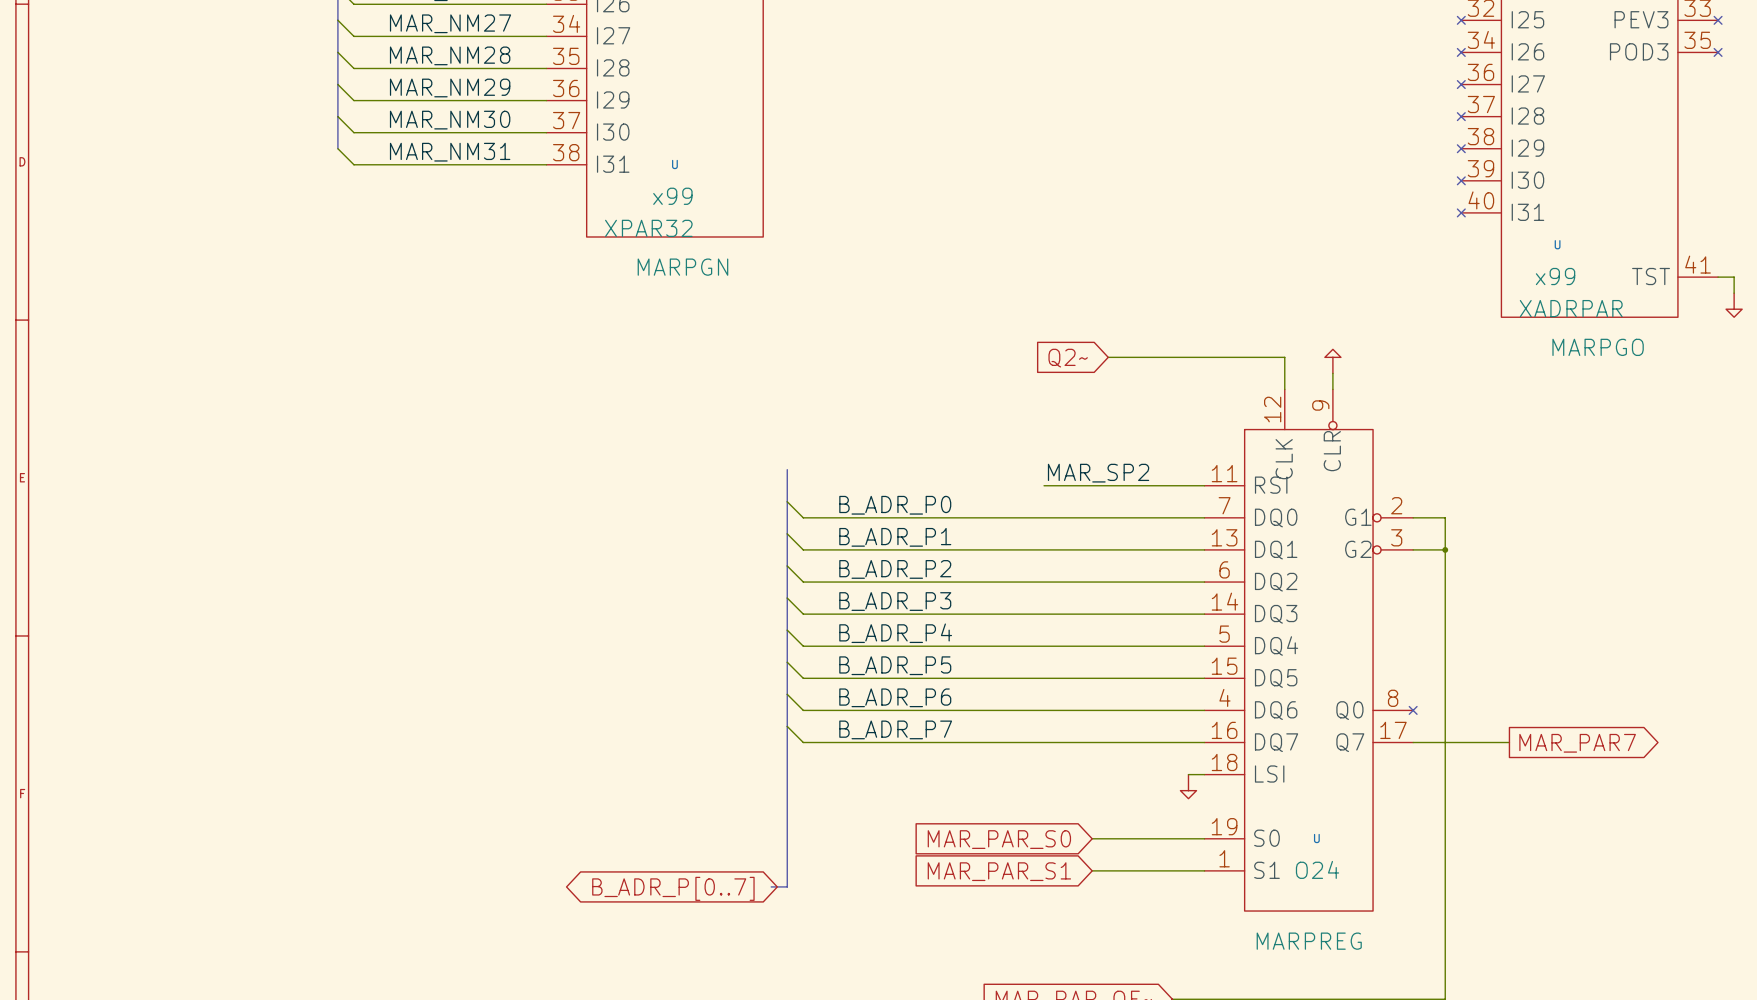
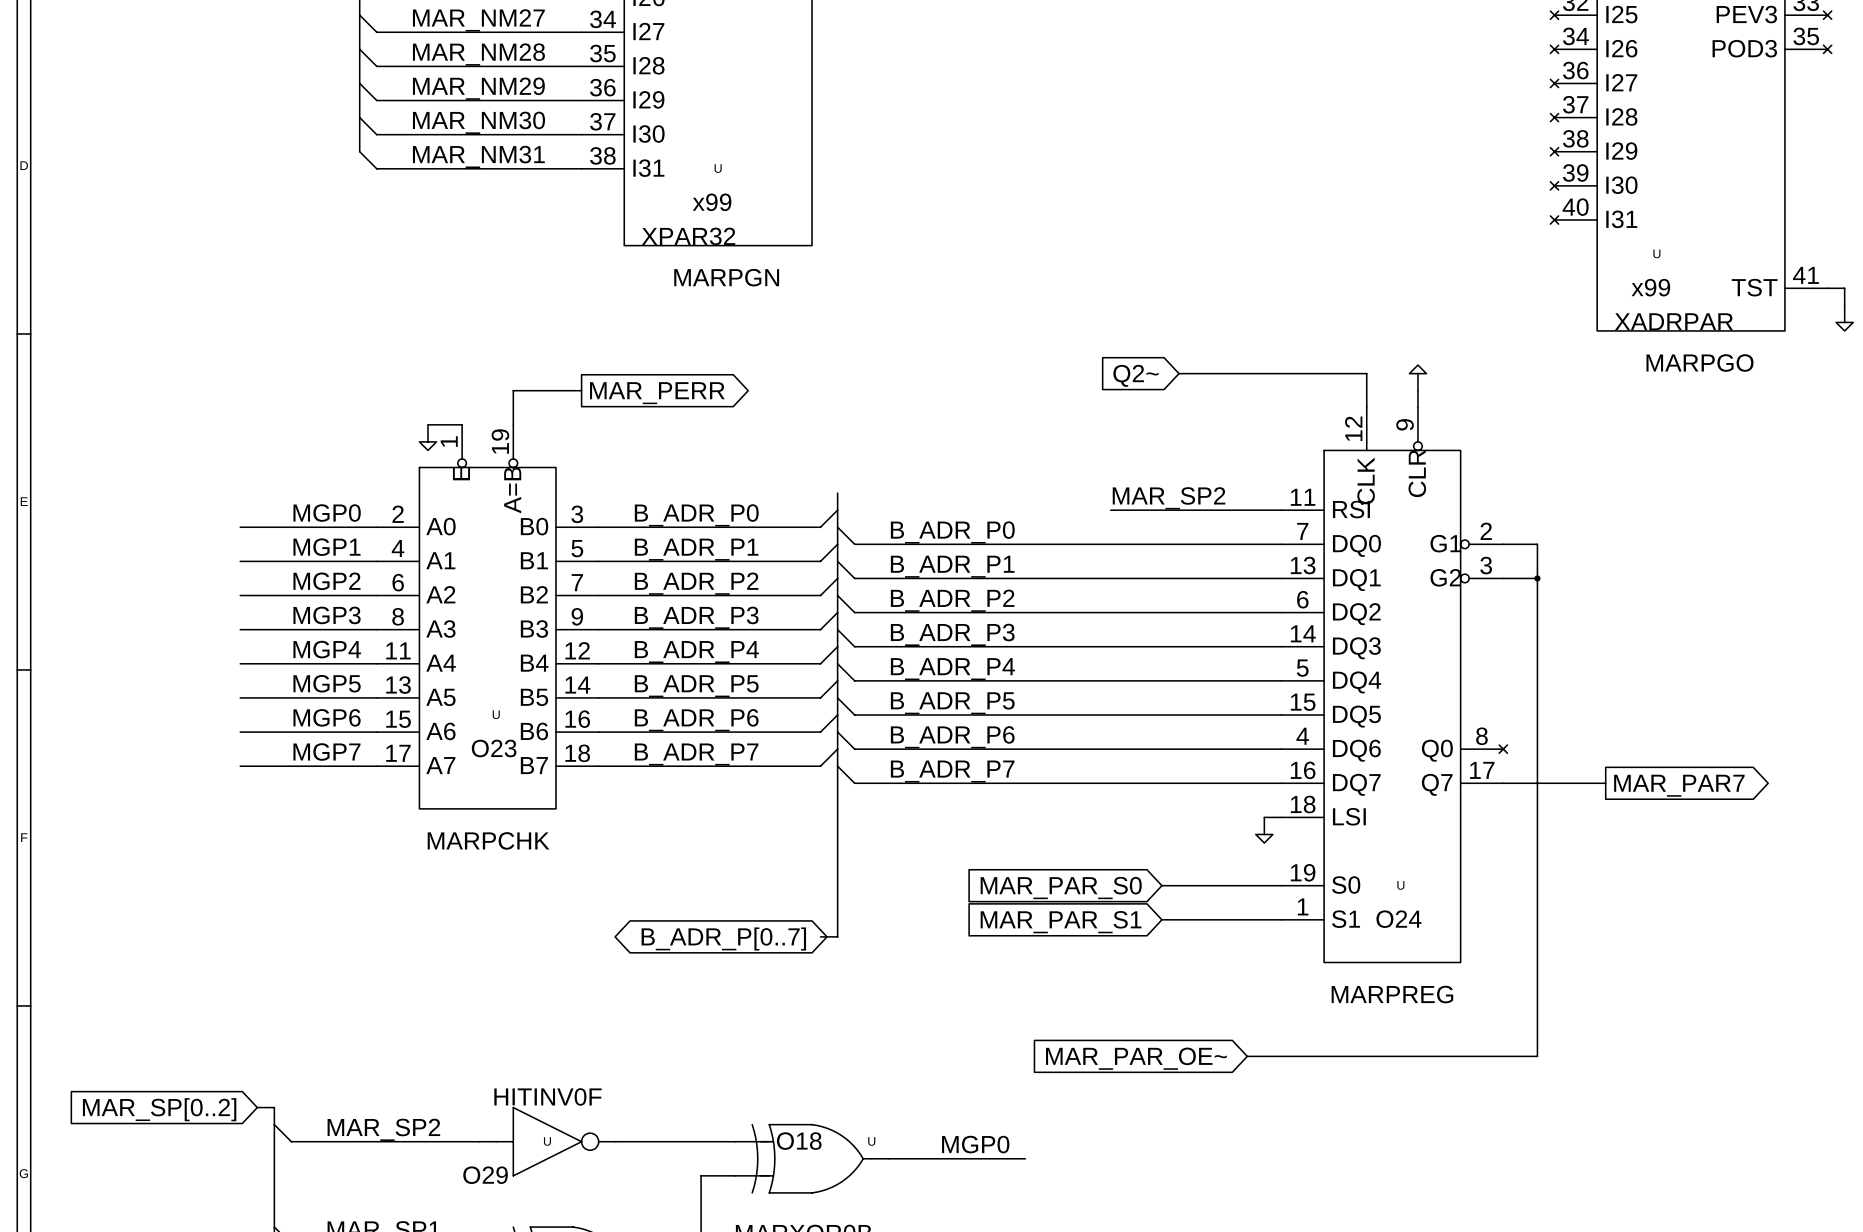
wire: none -> (581, 390) (513, 390) (513, 424)
global label: none -> MAR_PERR (657, 393)
wire: none -> (427, 424) (462, 424)
power symbol: none -> (427, 437)
wire: none -> (837, 510) (820, 527) (598, 527)
label: none -> MGP0 (327, 513)
label: none -> B_ADR_P0 (696, 515)
wire: none -> (240, 527) (376, 527)
wire: none -> (837, 544) (820, 561) (598, 561)
label: none -> MGP1 (327, 547)
label: none -> B_ADR_P1 (696, 549)
wire: none -> (240, 561) (376, 561)
wire: none -> (837, 578) (820, 595) (598, 595)
label: none -> MGP2 (326, 581)
label: none -> B_ADR_P2 (696, 583)
wire: none -> (240, 595) (376, 595)
wire: none -> (837, 612) (820, 629) (598, 629)
label: none -> MGP3 (327, 615)
label: none -> B_ADR_P3 (696, 617)
U: none -> (487, 616)
wire: none -> (240, 629) (376, 629)
wire: none -> (837, 646) (820, 663) (598, 663)
label: none -> MGP4 (327, 649)
label: none -> B_ADR_P4 (696, 652)
wire: none -> (240, 663) (376, 663)
wire: none -> (837, 680) (820, 697) (598, 697)
label: none -> MGP5 (327, 683)
label: none -> B_ADR_P5 (696, 686)
wire: none -> (240, 697) (376, 697)
wire: none -> (837, 715) (820, 732) (598, 732)
label: none -> MGP6 (327, 717)
label: none -> B_ADR_P6 (696, 720)
wire: none -> (240, 732) (376, 732)
wire: none -> (837, 749) (820, 766) (598, 766)
label: none -> MGP7 (326, 751)
label: none -> B_ADR_P7 (696, 754)
wire: none -> (240, 766) (376, 766)

